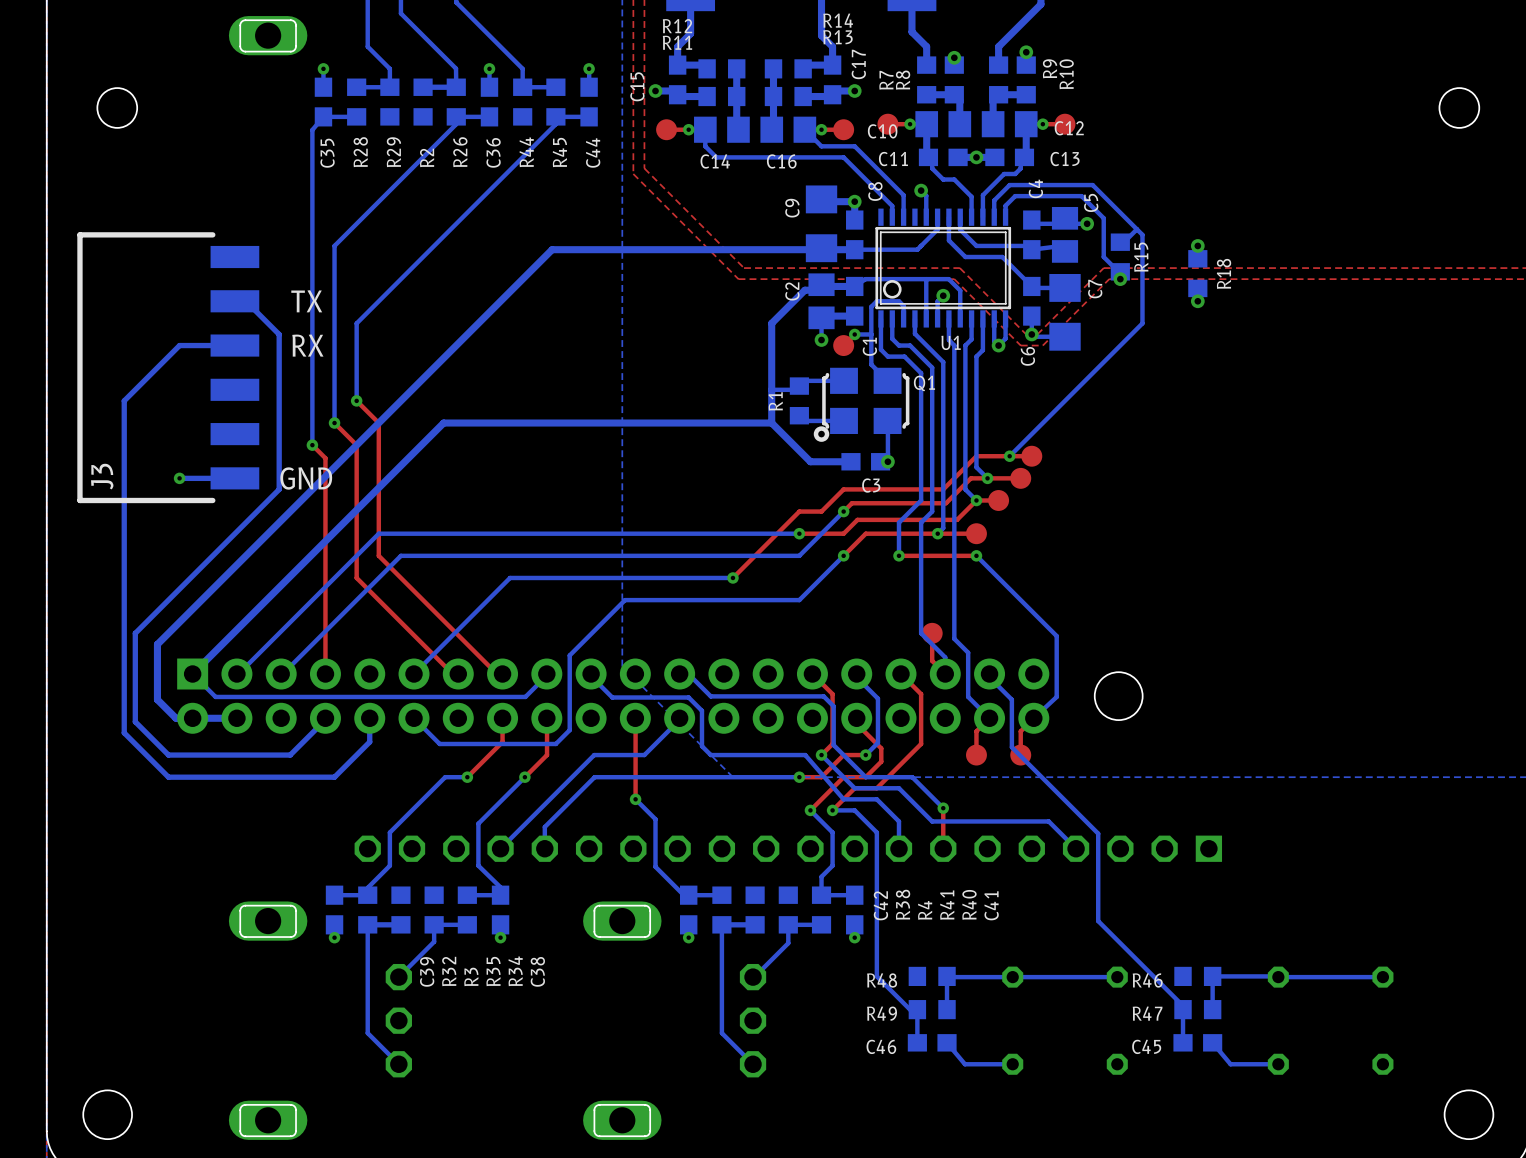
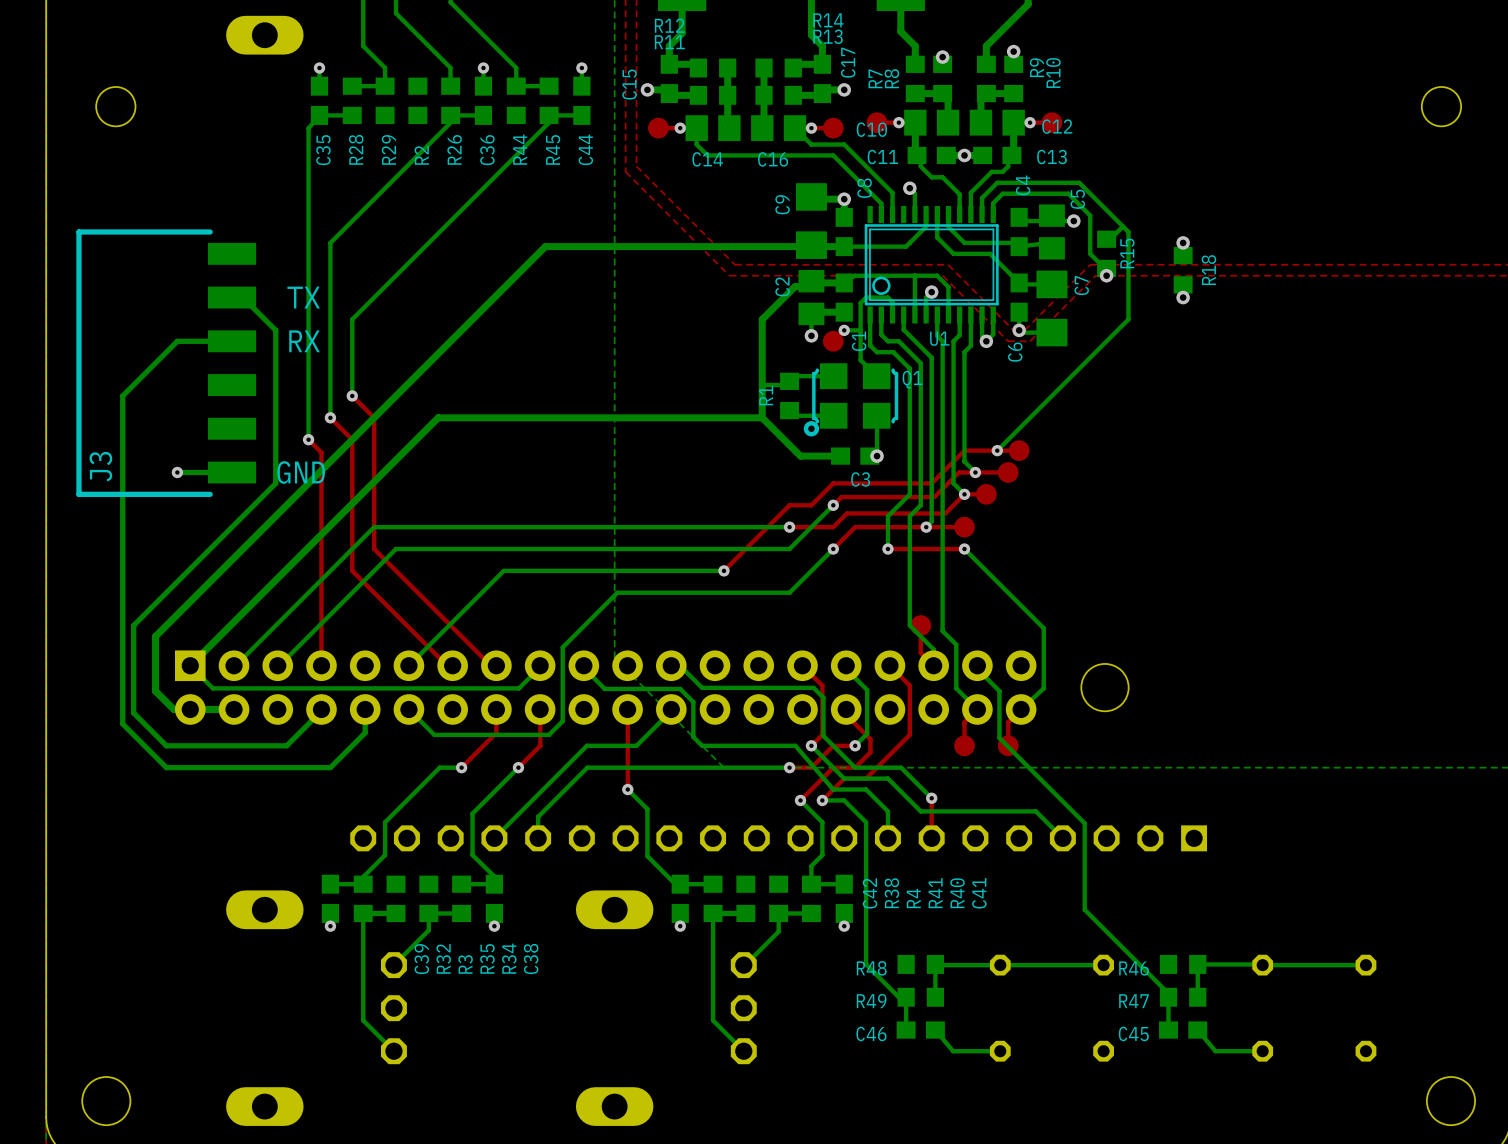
bottom track: (456, 87) (423, 87) -> none

